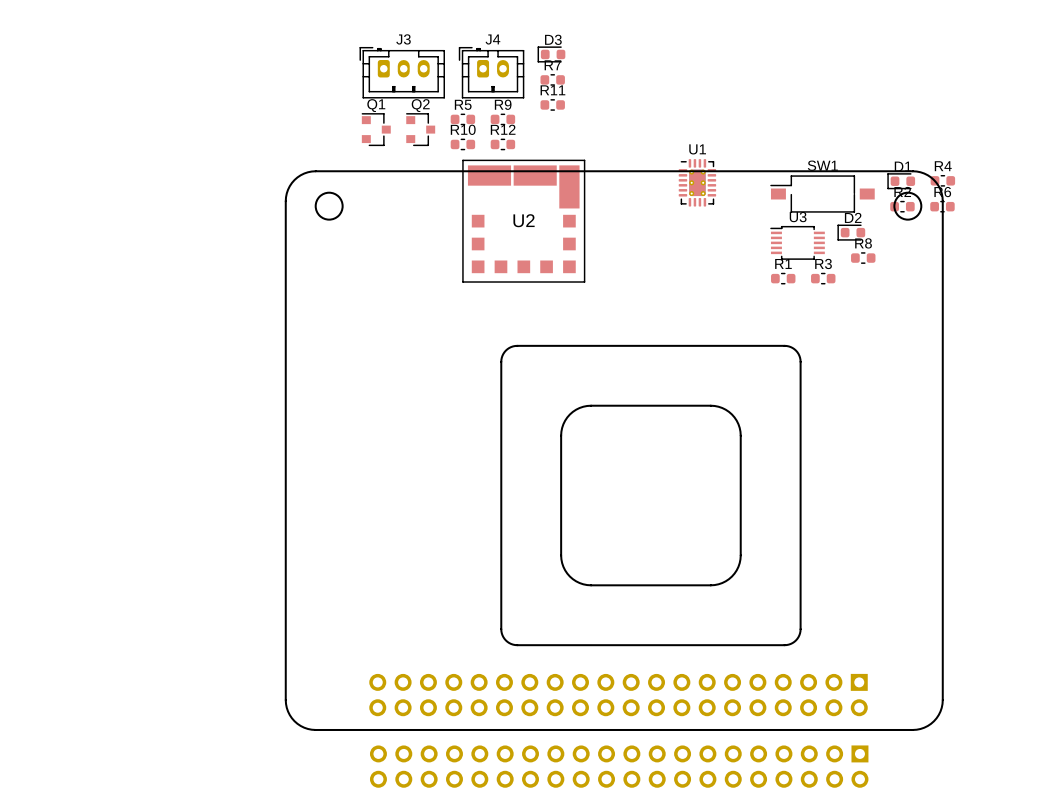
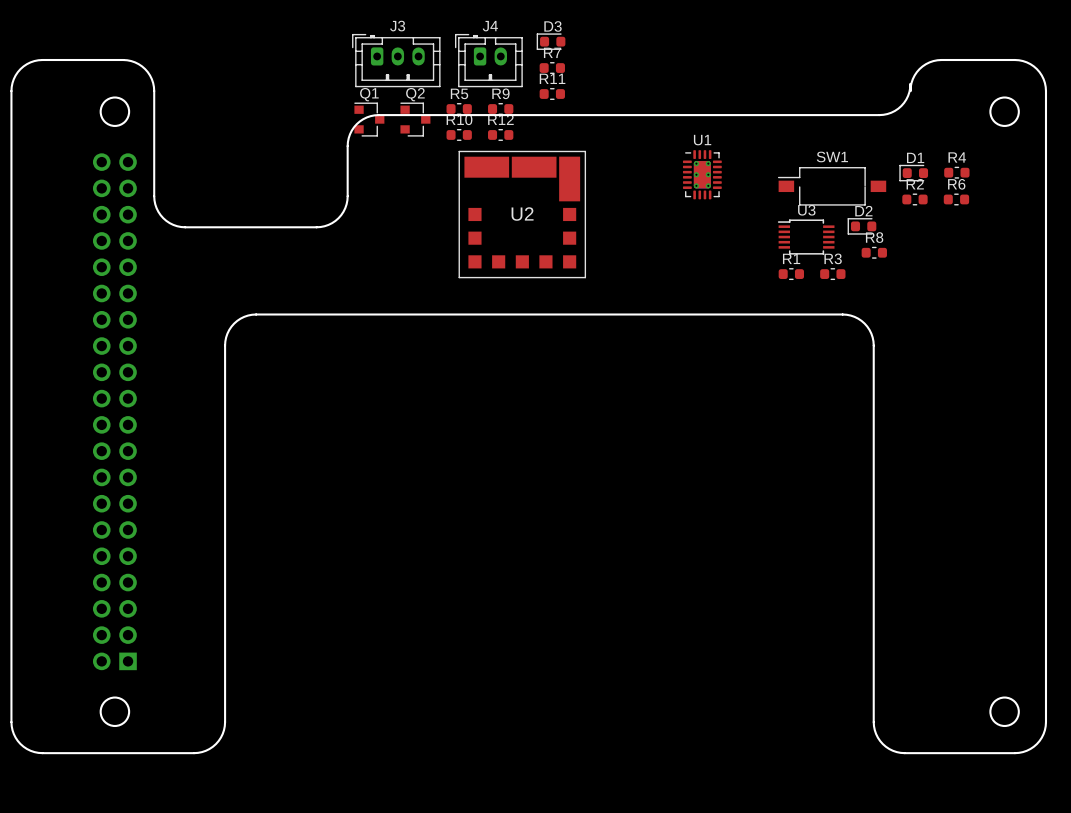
round board edge: none -> [99, 96, 131, 127]
round board edge: none -> [989, 96, 1020, 127]
board edge: (315, 171) (912, 171) (924, 173) (934, 180) (940, 189) (942, 201) (942, 700) (940, 711) (934, 721) (924, 727) (912, 729) (315, 729) (304, 727) (294, 721) (288, 711) (285, 700) (285, 201) (288, 189) (294, 180) (304, 173) (315, 171) -> (42, 60) (30, 62) (20, 69) (13, 79) (11, 91) (11, 722) (13, 733) (23, 746) (30, 750) (42, 753) (194, 753) (209, 748) (220, 737) (225, 722) (225, 341) (229, 330) (234, 323) (244, 316) (256, 314) (842, 314) (858, 318) (869, 330) (873, 345) (873, 722) (876, 733) (885, 746) (892, 750) (904, 753) (1019, 752) (1030, 748) (1039, 741) (1043, 733) (1045, 722) (1045, 91) (1043, 79) (1033, 66) (1026, 62) (1014, 60) (933, 61) (925, 64) (916, 72) (912, 79) (910, 91) (910, 84) (908, 95) (901, 106) (891, 112) (883, 114) (374, 115) (359, 121) (350, 134) (347, 146) (346, 204) (341, 215) (332, 223) (316, 227) (185, 227) (177, 226) (166, 220) (158, 211) (155, 204) (154, 91) (153, 83) (147, 72) (138, 64) (127, 60) (42, 60)
round board edge: [314, 191, 344, 221] -> none
round board edge: [893, 191, 923, 221] -> none
line: (517, 345) (784, 345) (795, 350) (800, 361) (800, 629) (795, 640) (784, 645) (517, 645) (505, 640) (501, 629) (501, 361) (505, 350) (517, 345) -> none
board edge: (591, 405) (714, 405) (725, 409) (734, 417) (738, 424) (740, 435) (740, 555) (738, 566) (729, 579) (722, 583) (710, 585) (591, 585) (579, 583) (567, 573) (563, 566) (561, 555) (561, 431) (565, 420) (572, 411) (579, 408) (591, 405) -> none
part: none -> (114, 411)
round board edge: none -> [99, 696, 131, 728]
round board edge: none -> [989, 696, 1020, 728]
part: (618, 695) -> none
part: (619, 766) -> none

